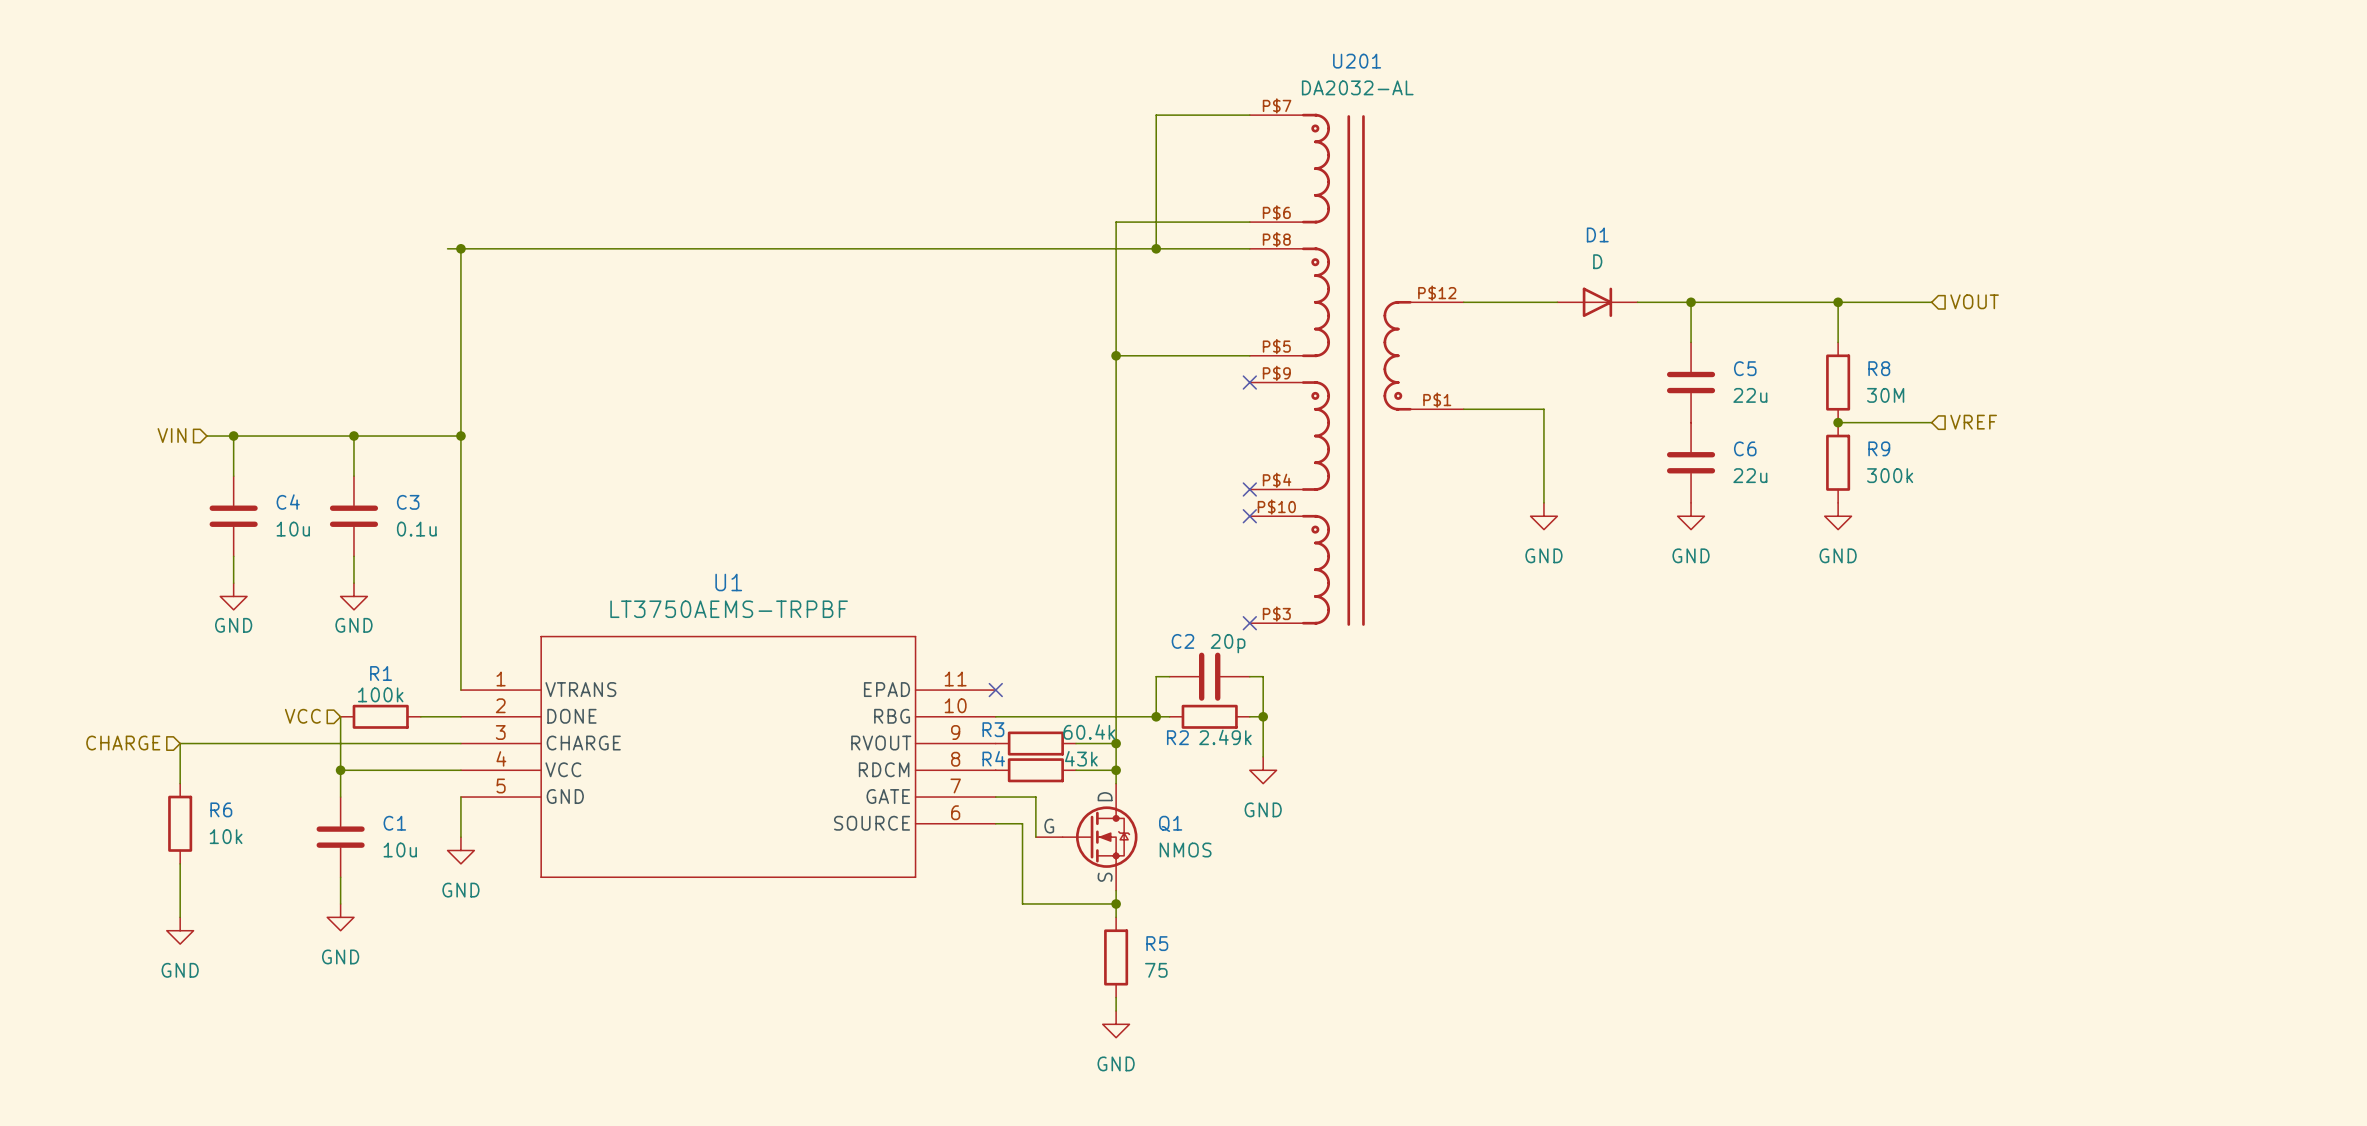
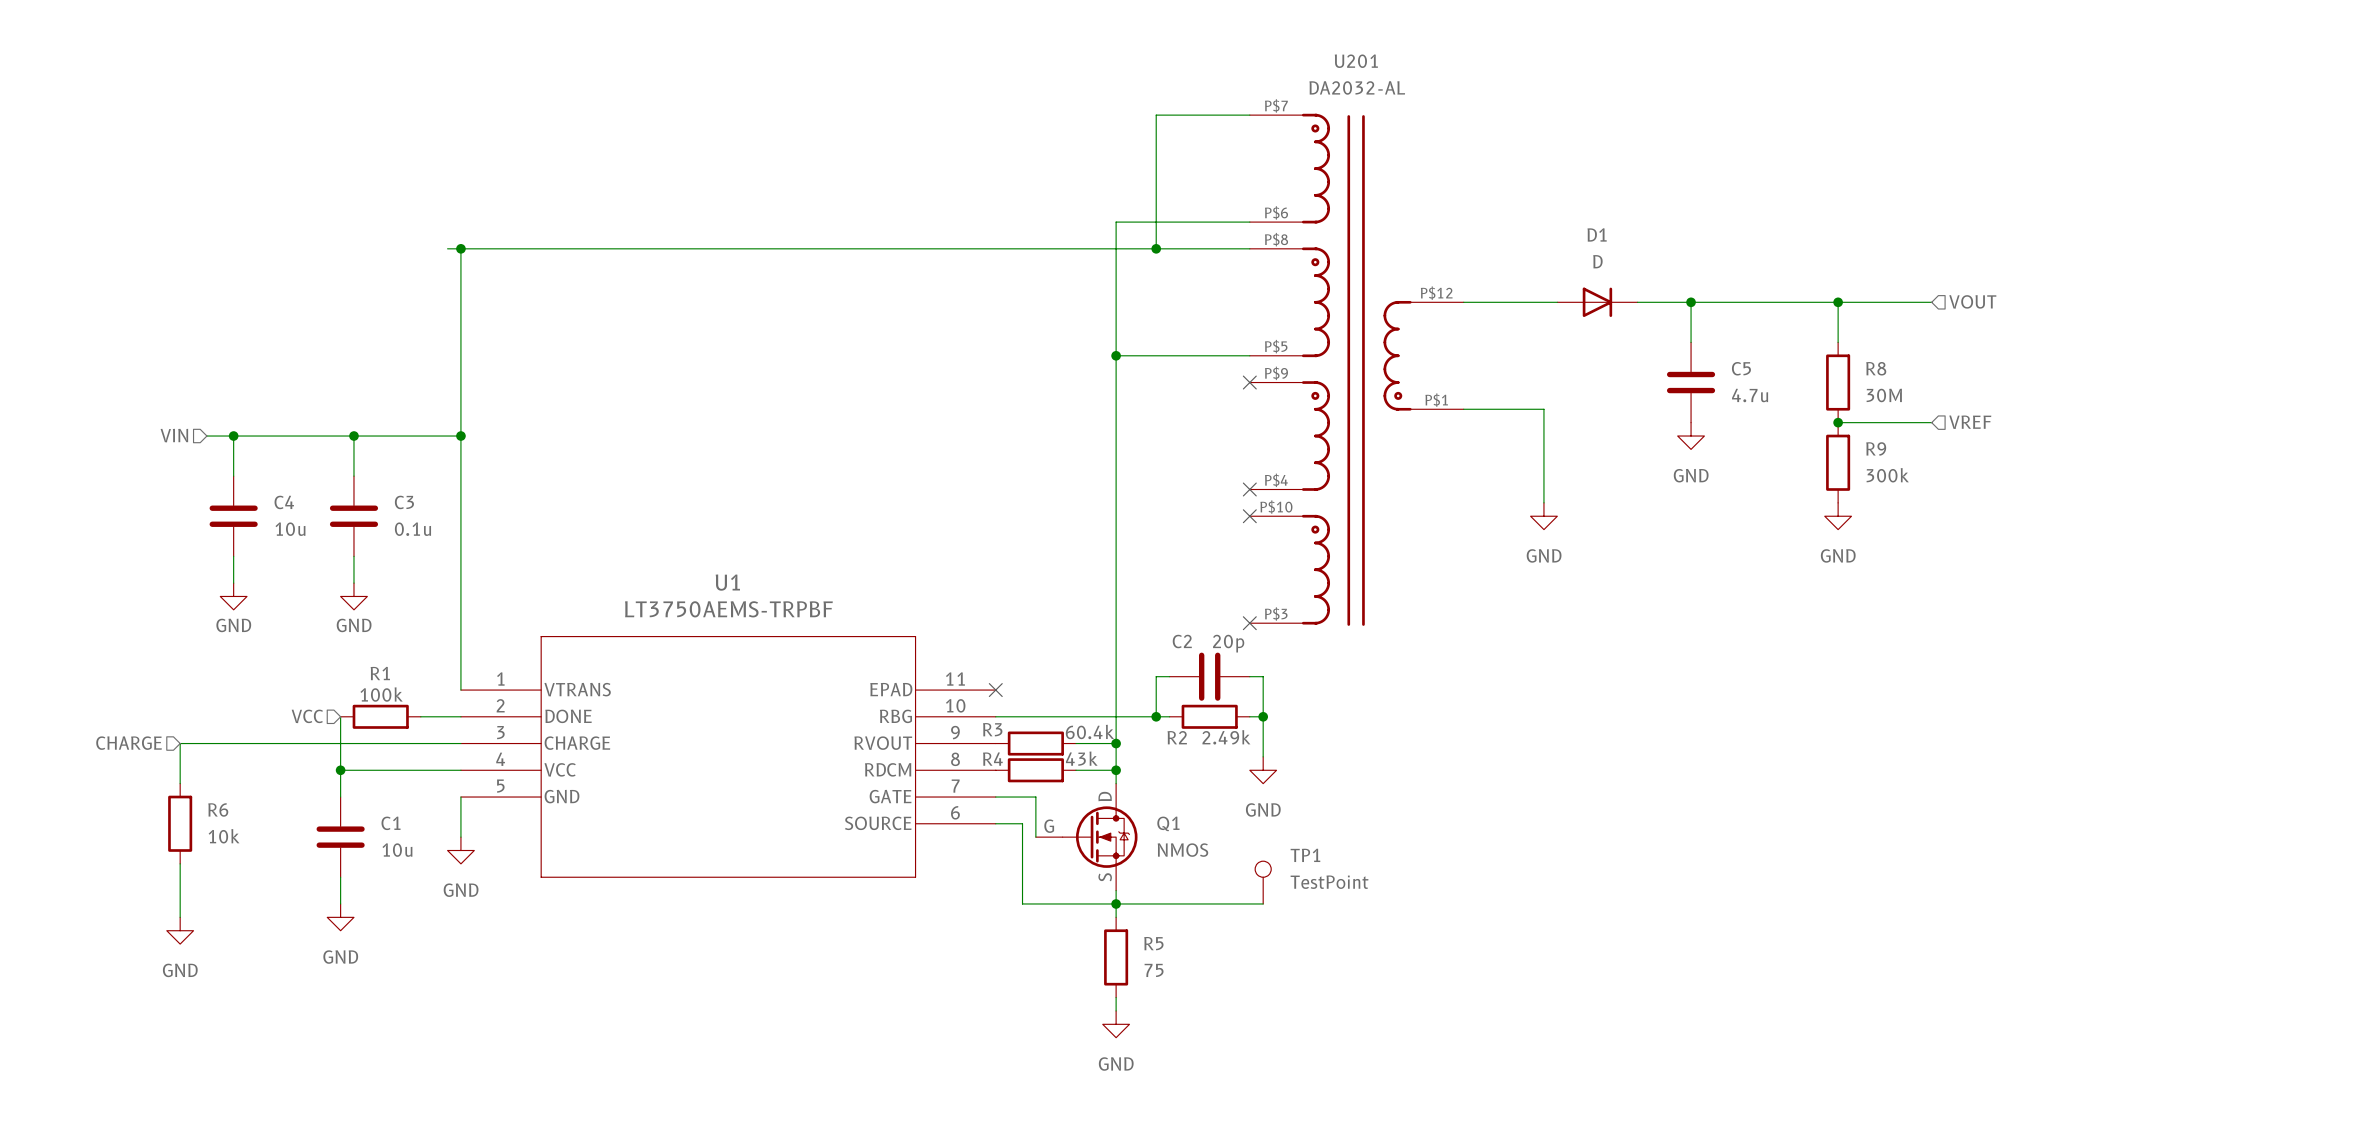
C5 value: 22u (1750, 395) -> 4.7u (1750, 395)
C6: 22u (1691, 462) -> none
power symbol position: GND (1691, 516) -> GND (1691, 436)
TP1: none -> TestPoint (1263, 882)
wire: none -> (1116, 903) (1263, 903)

